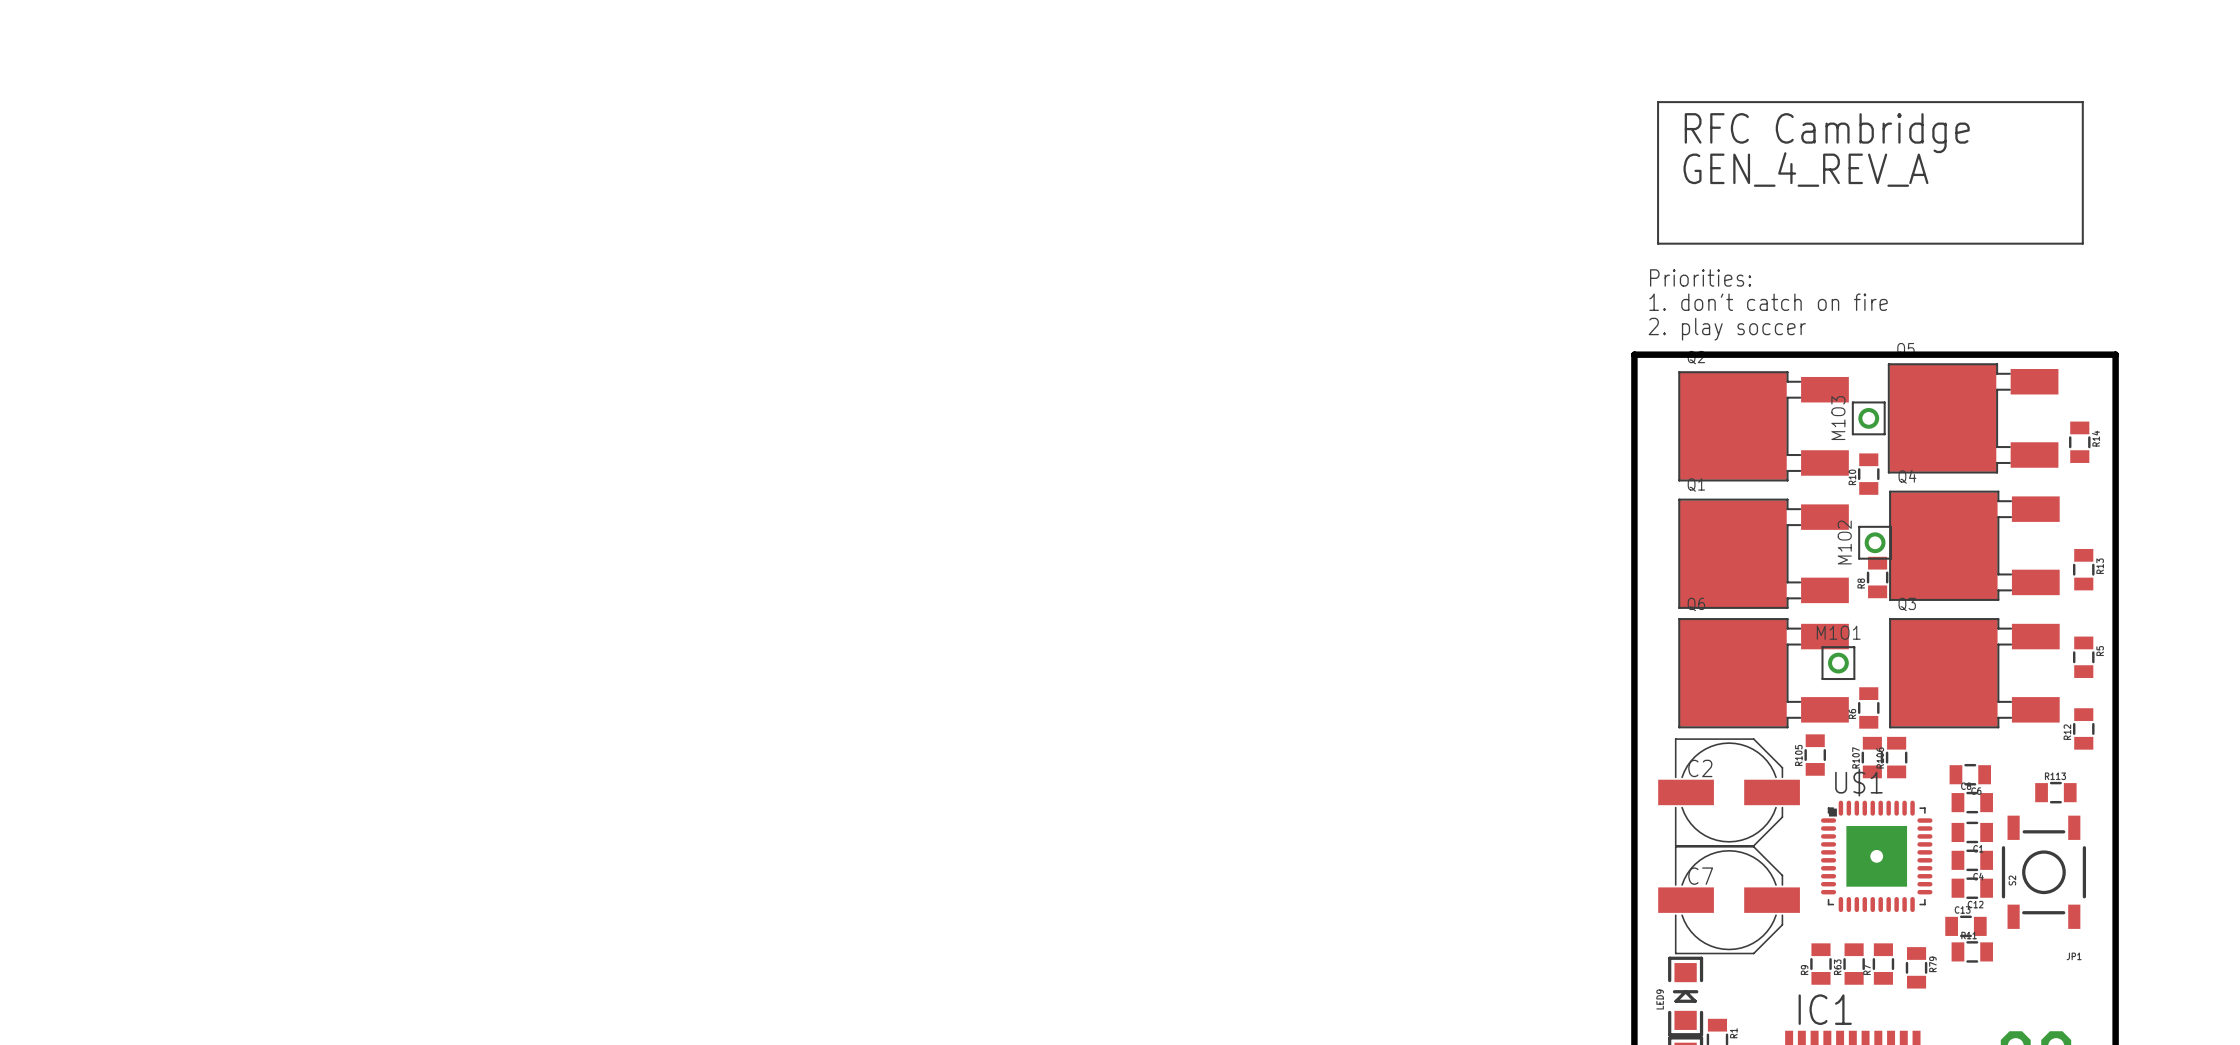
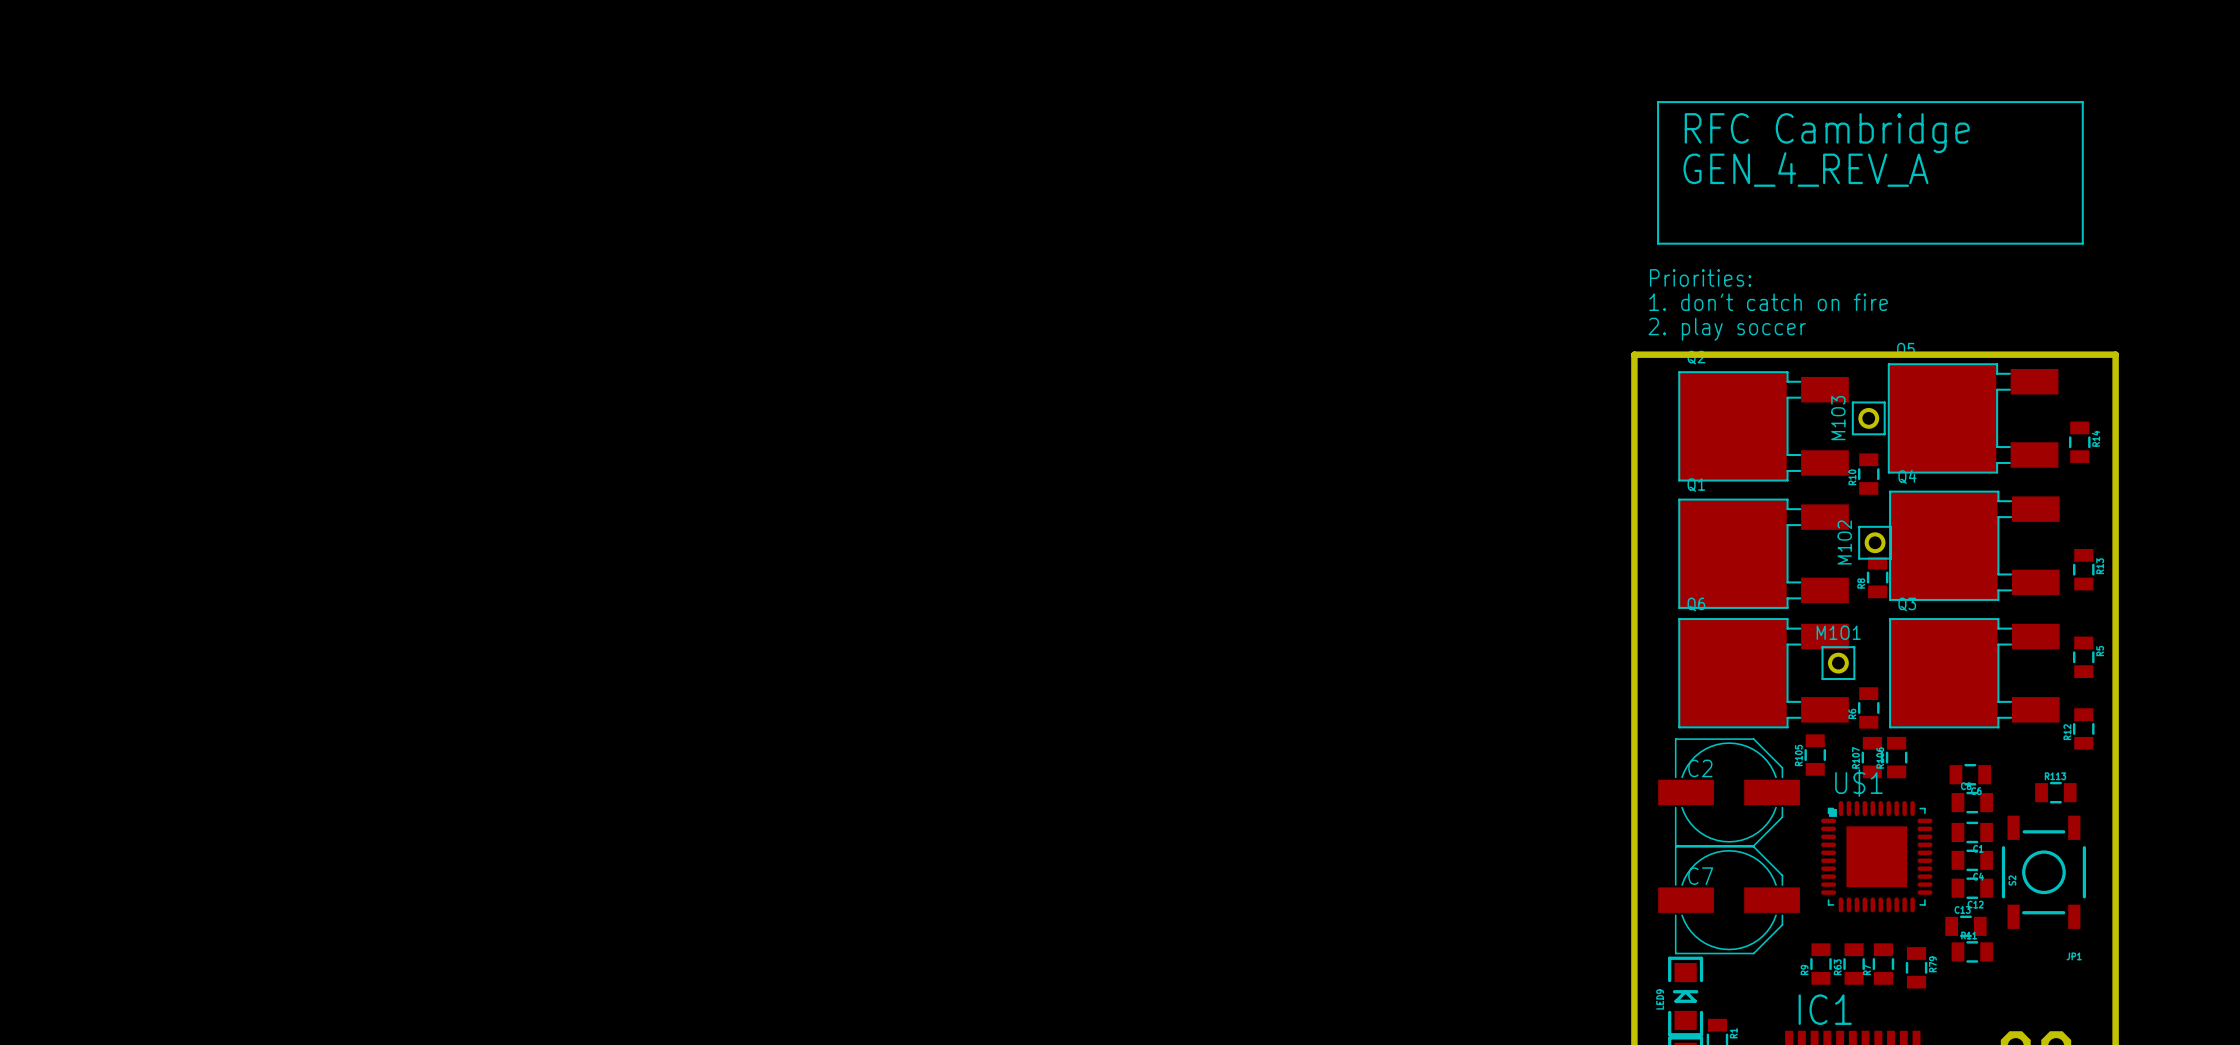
U$1 footprint: [1820, 800, 1933, 913] -> [1821, 800, 1933, 913]

